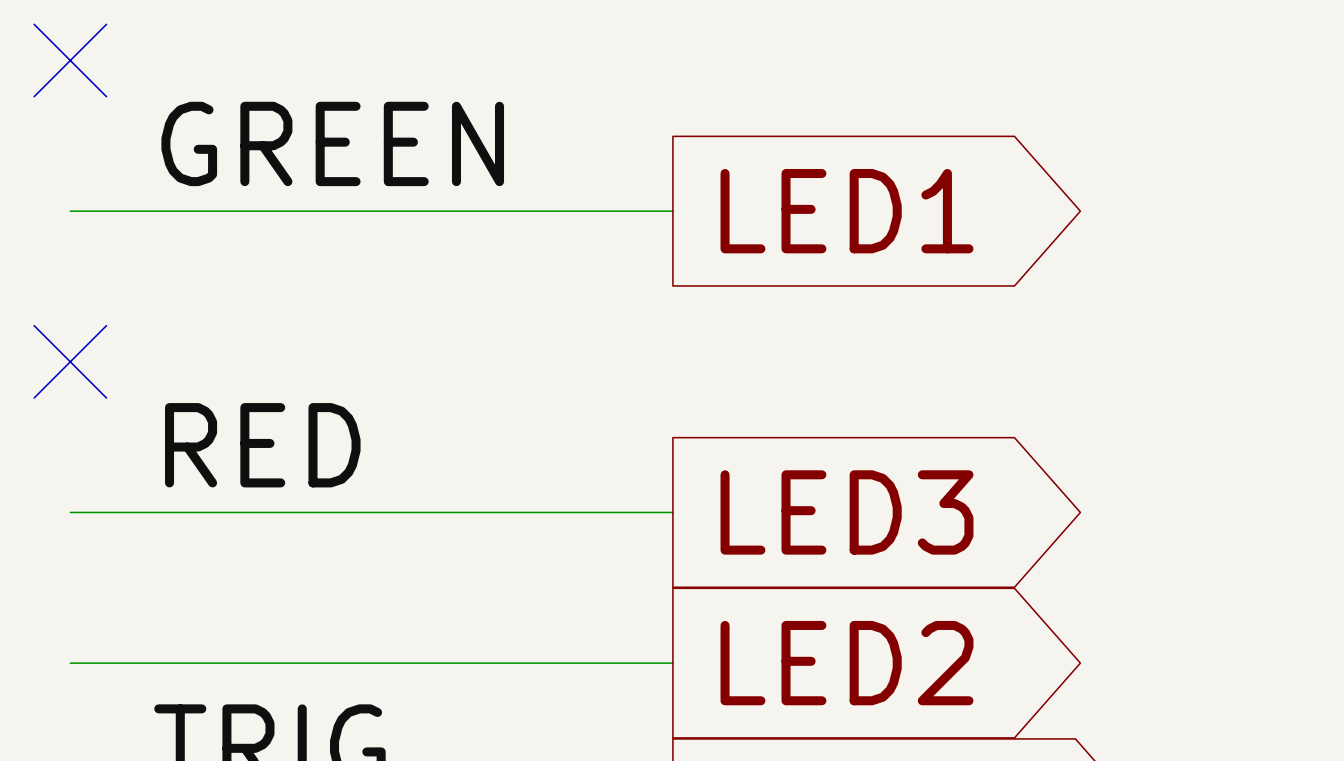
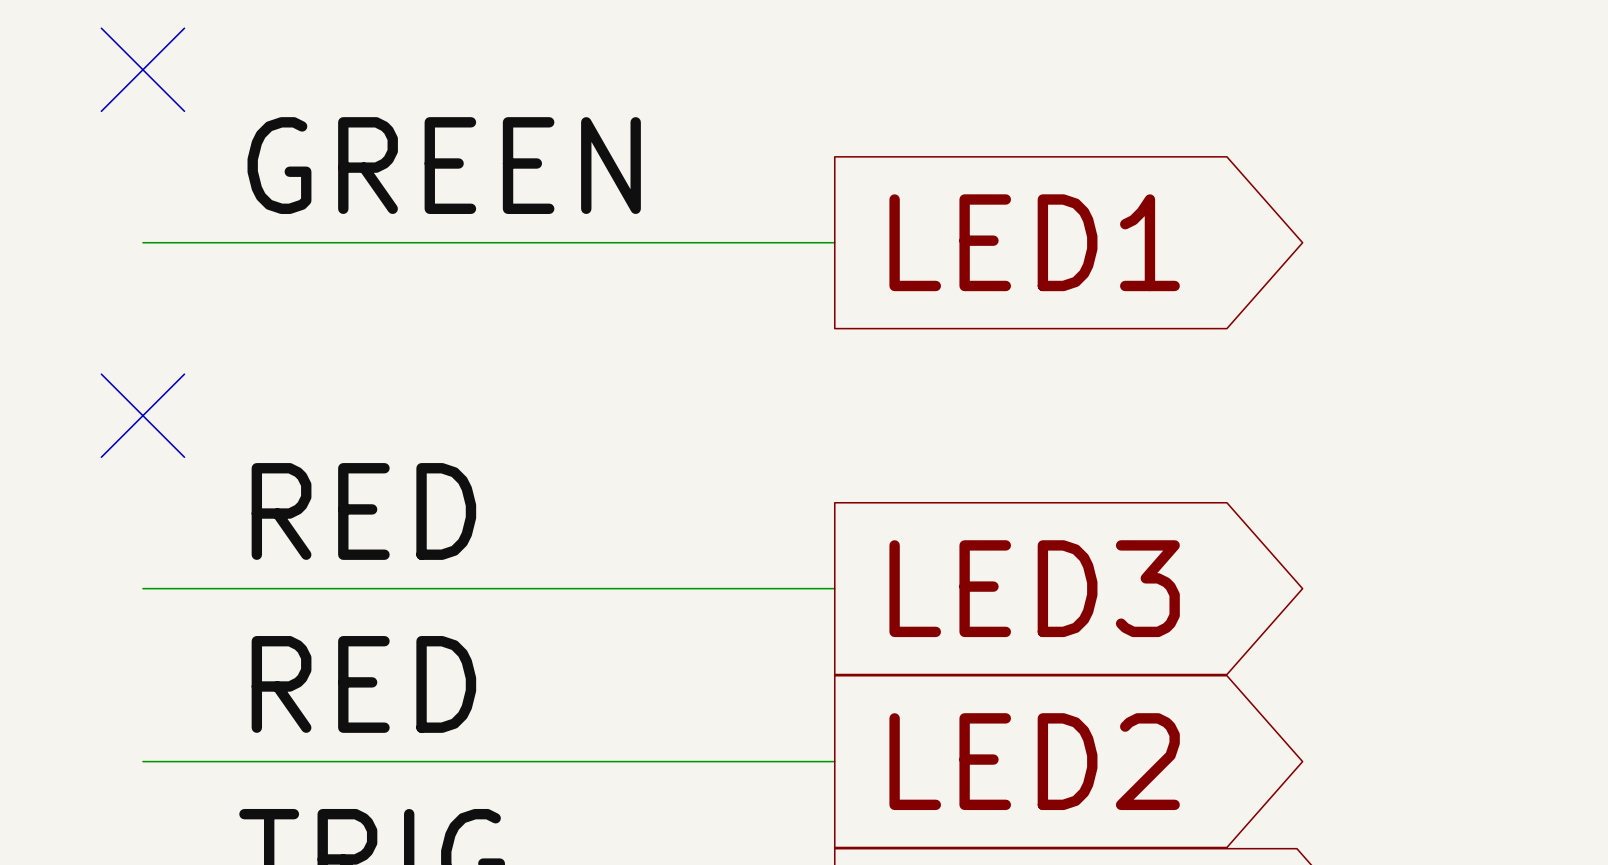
label: none -> RED (363, 684)

